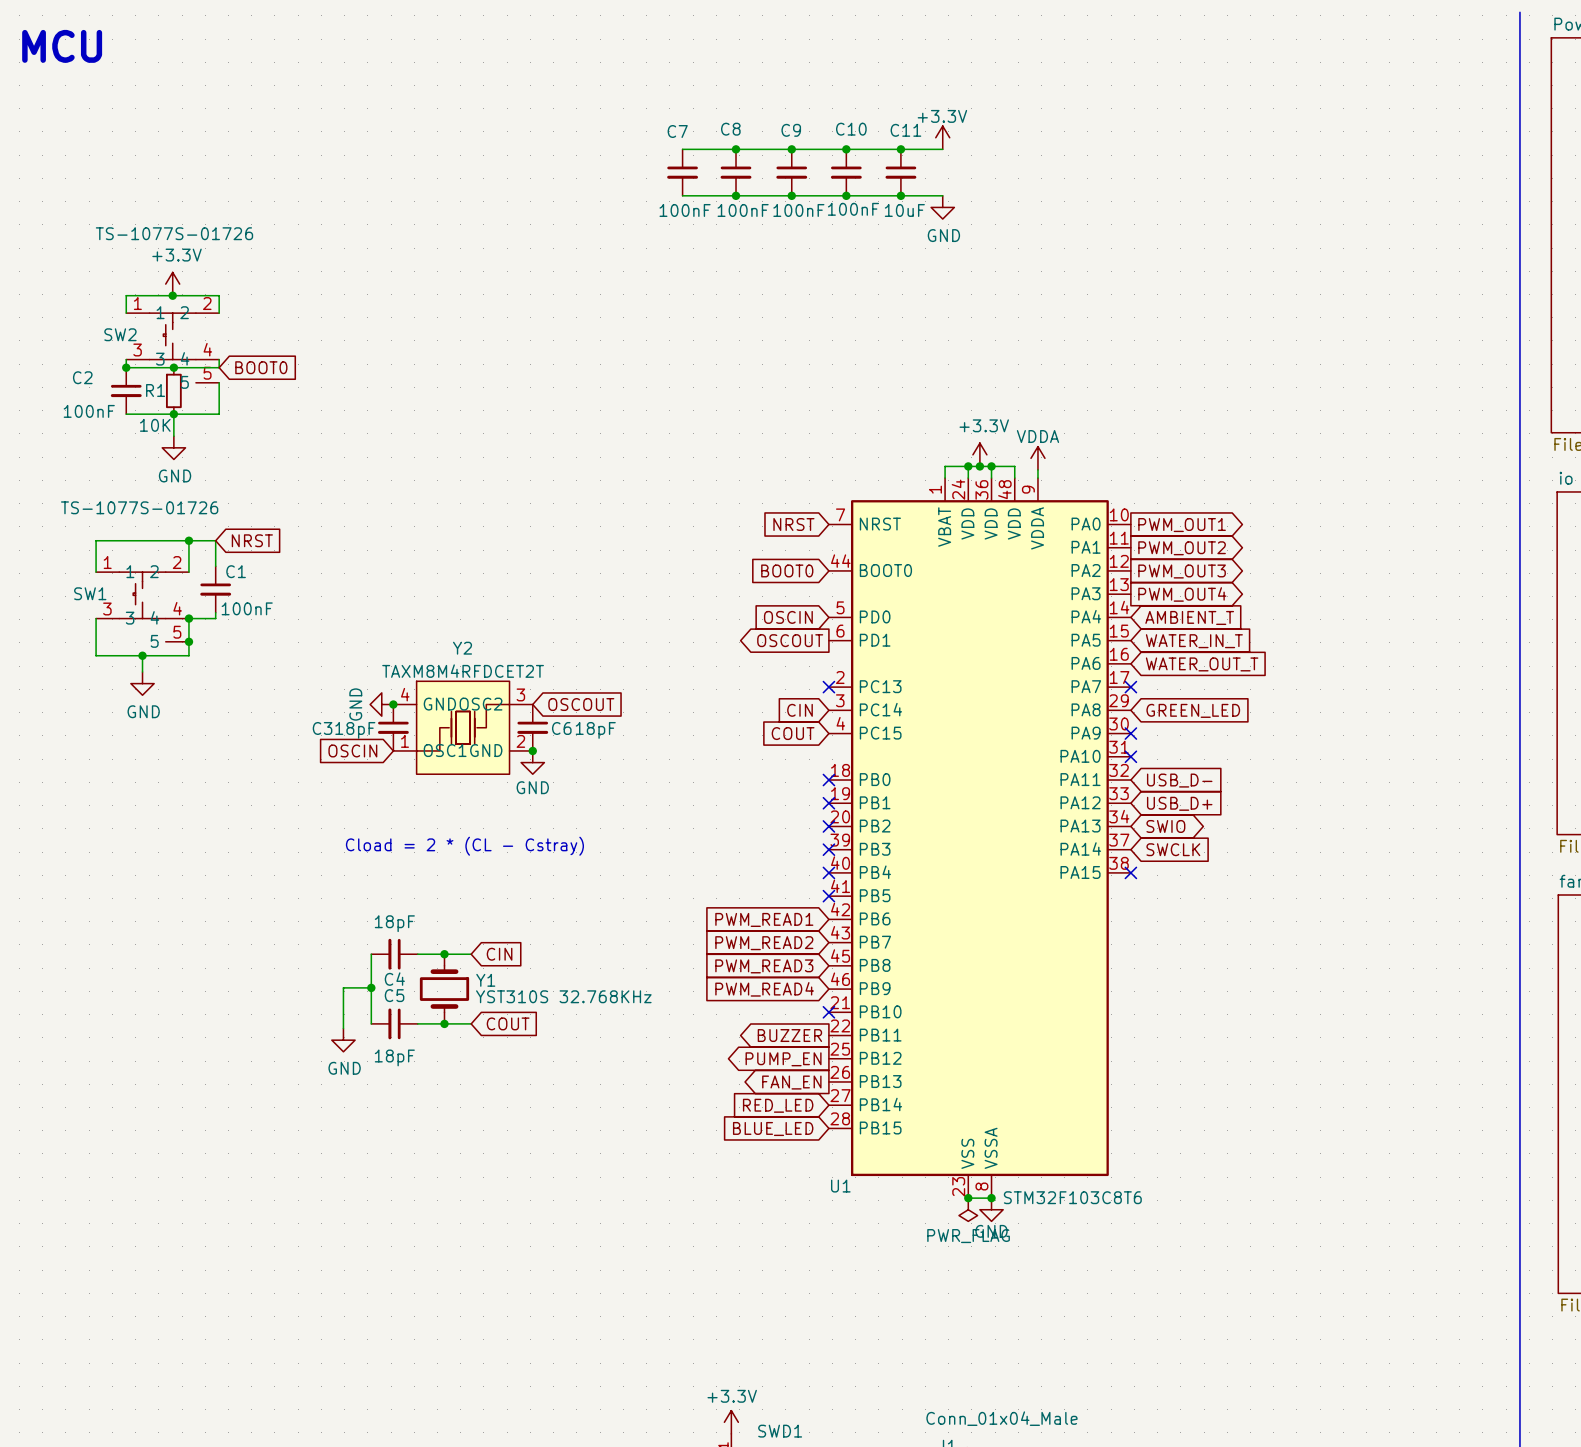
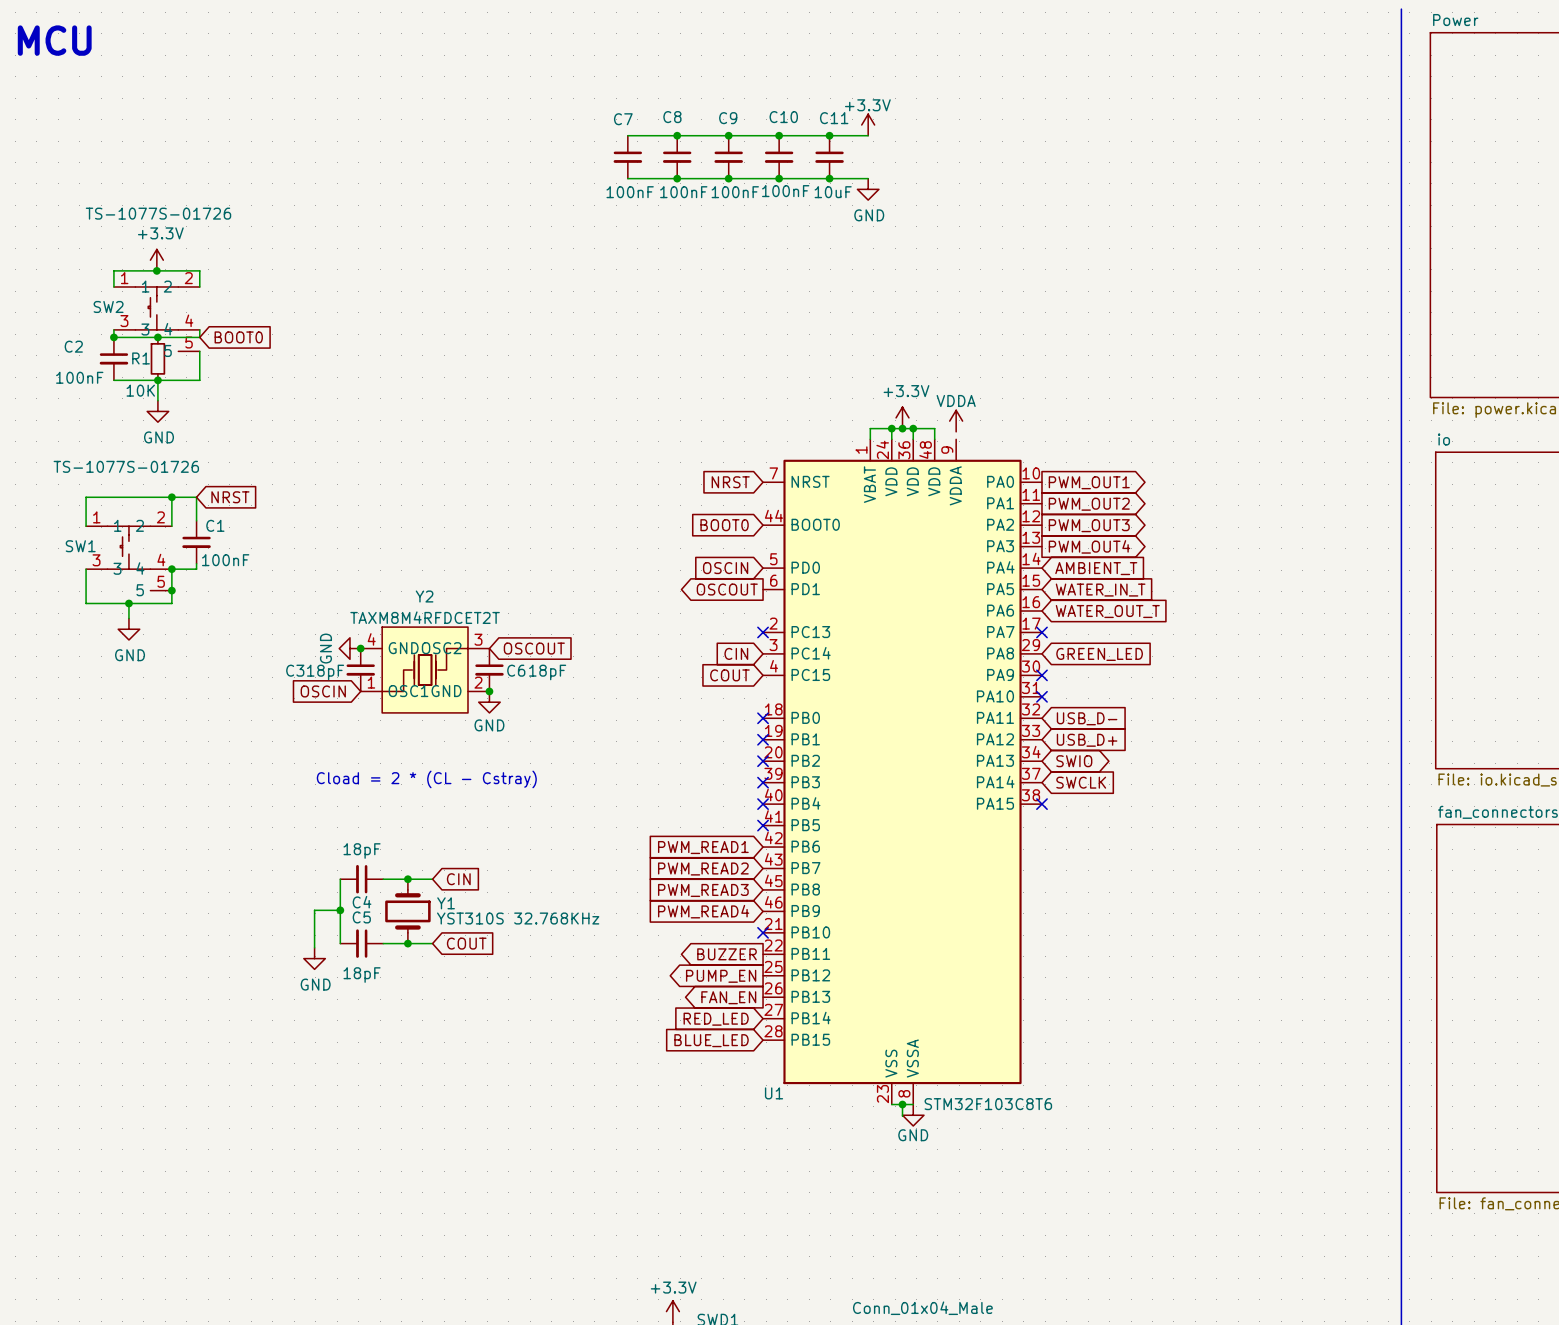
wire: (1037, 469) (1037, 478) -> none
junction: (968, 1198) -> none
wire: none -> (902, 1104) (902, 1116)
junction: none -> (902, 1104)
junction: (991, 1198) -> none
power symbol: PWR_FLAG (968, 1209) -> none

